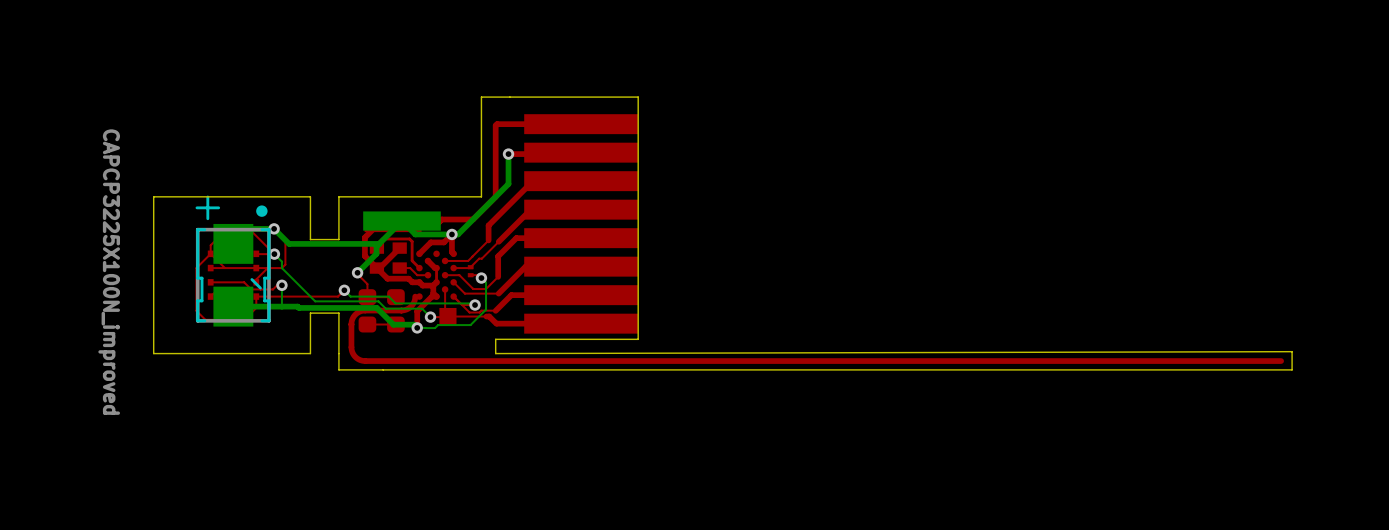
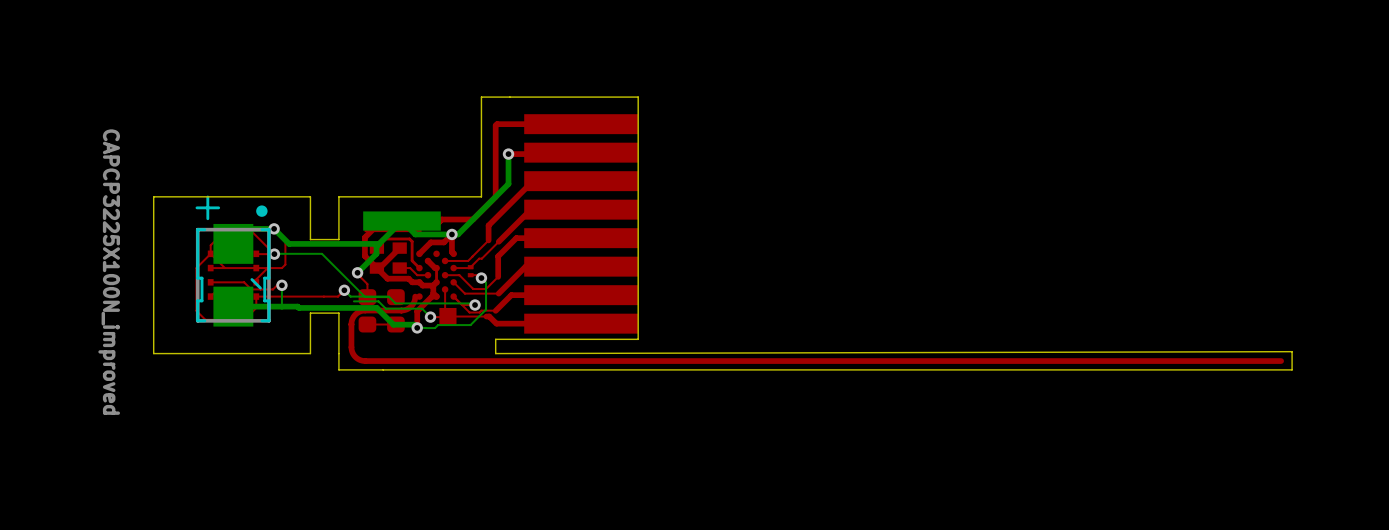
bottom track: (274, 254) (281, 261) (282, 268) (315, 301) (353, 301) -> (274, 253) (321, 253) (365, 296) (389, 296)

